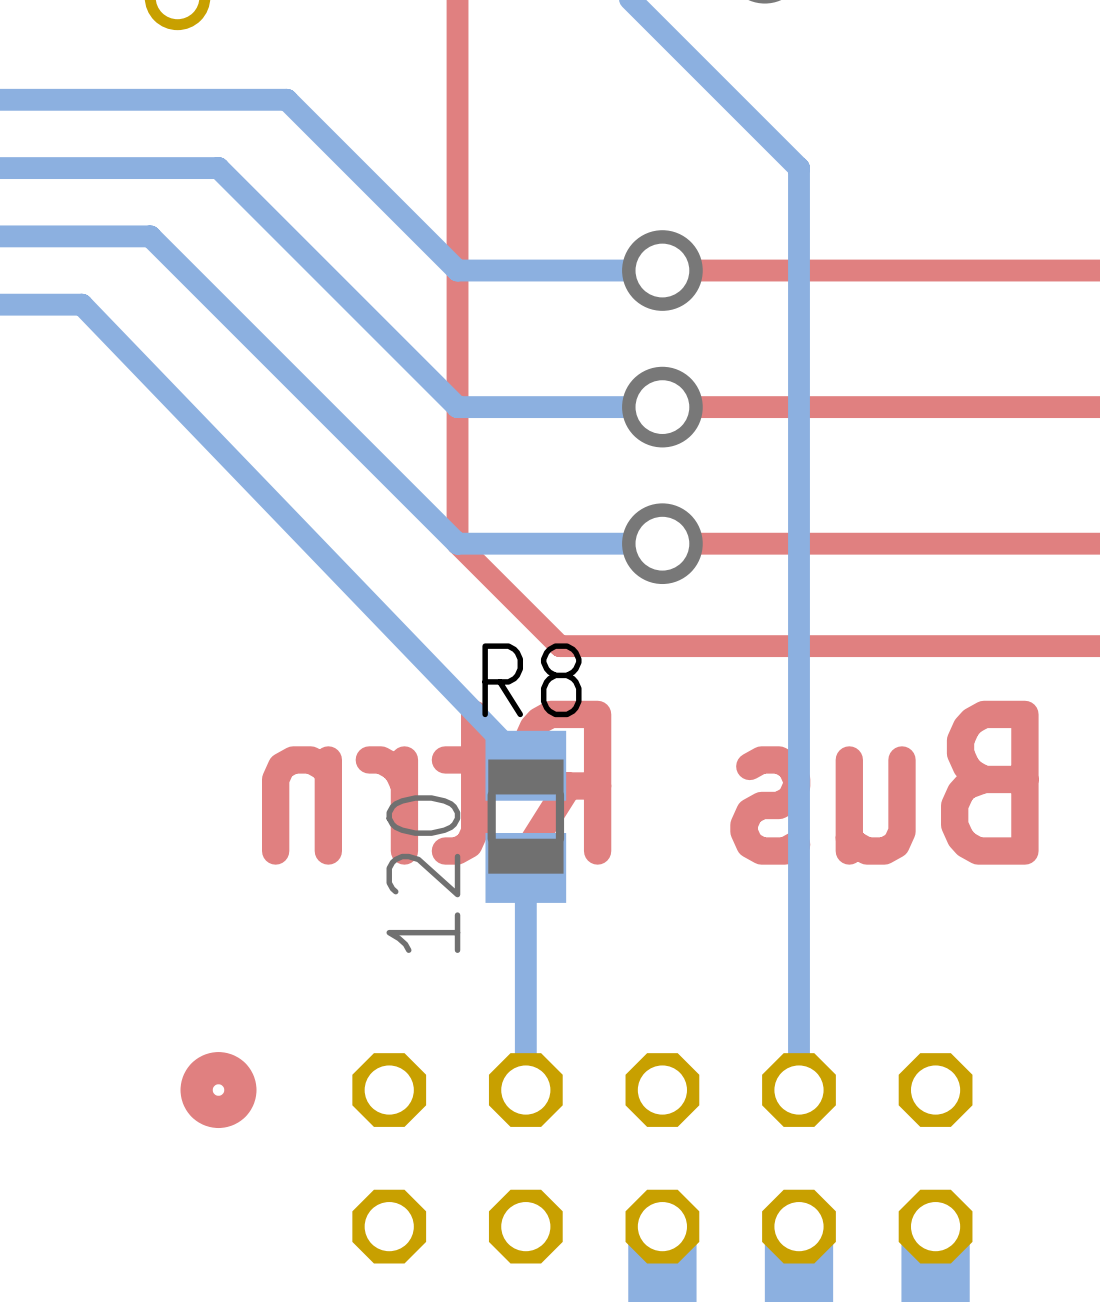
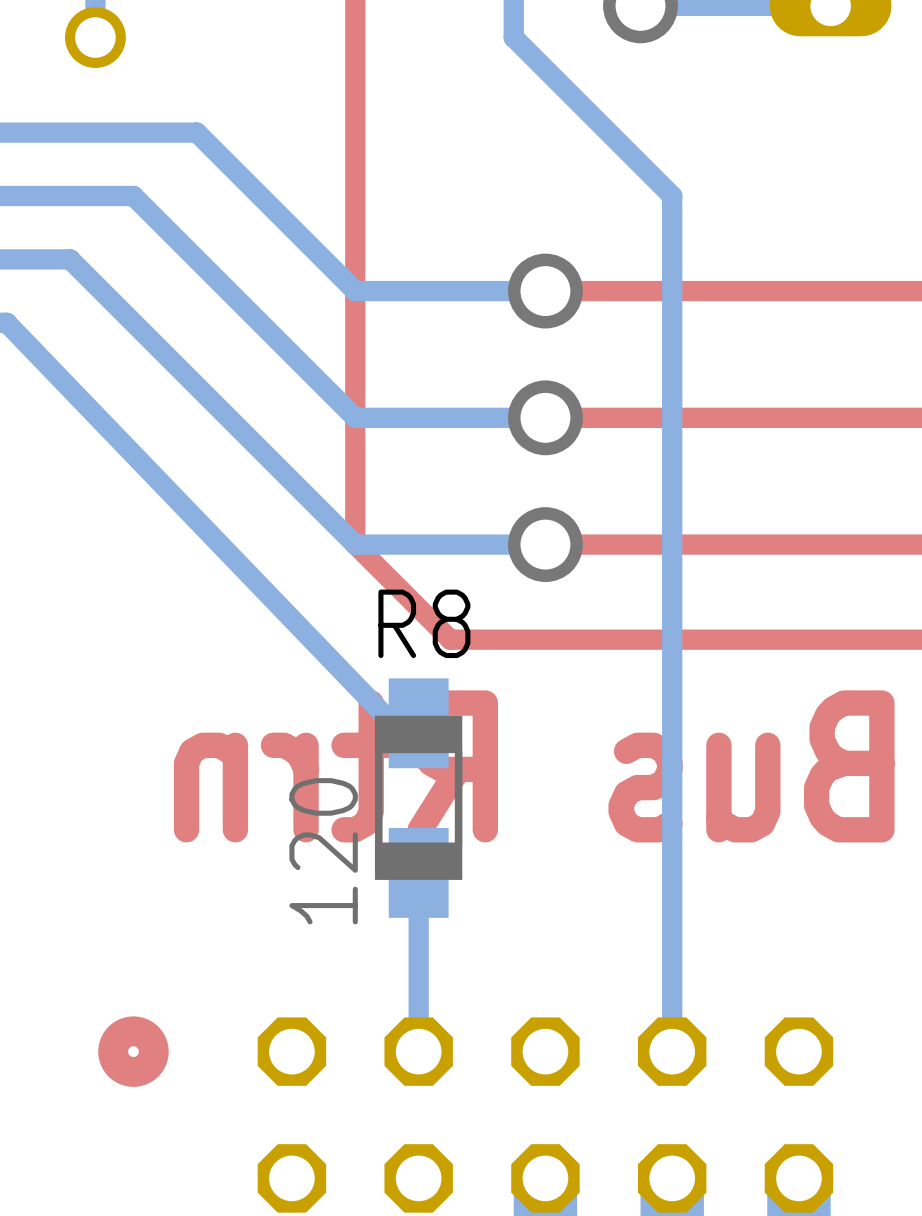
R8 name position: R8 (531, 680) -> R8 (424, 623)
R8 footprint: [485, 730, 567, 903] -> [374, 678, 463, 918]

